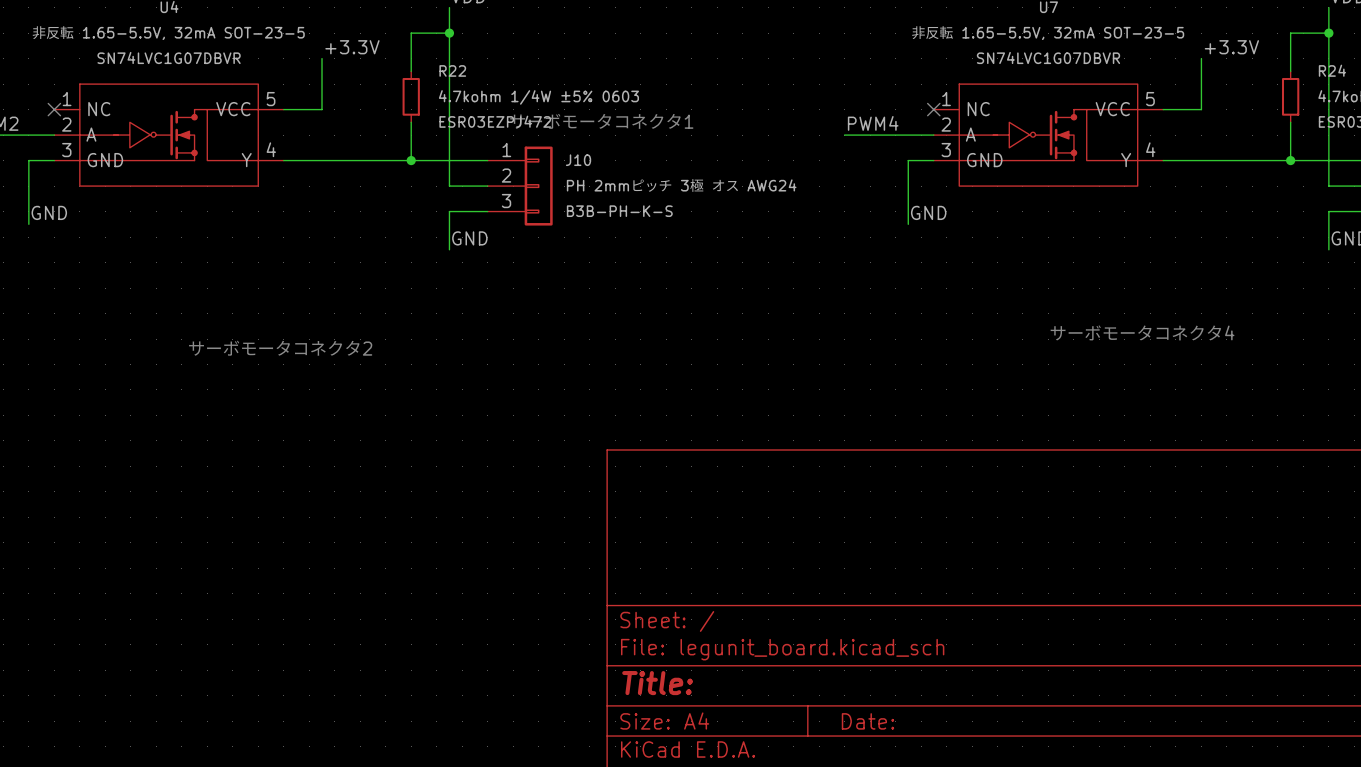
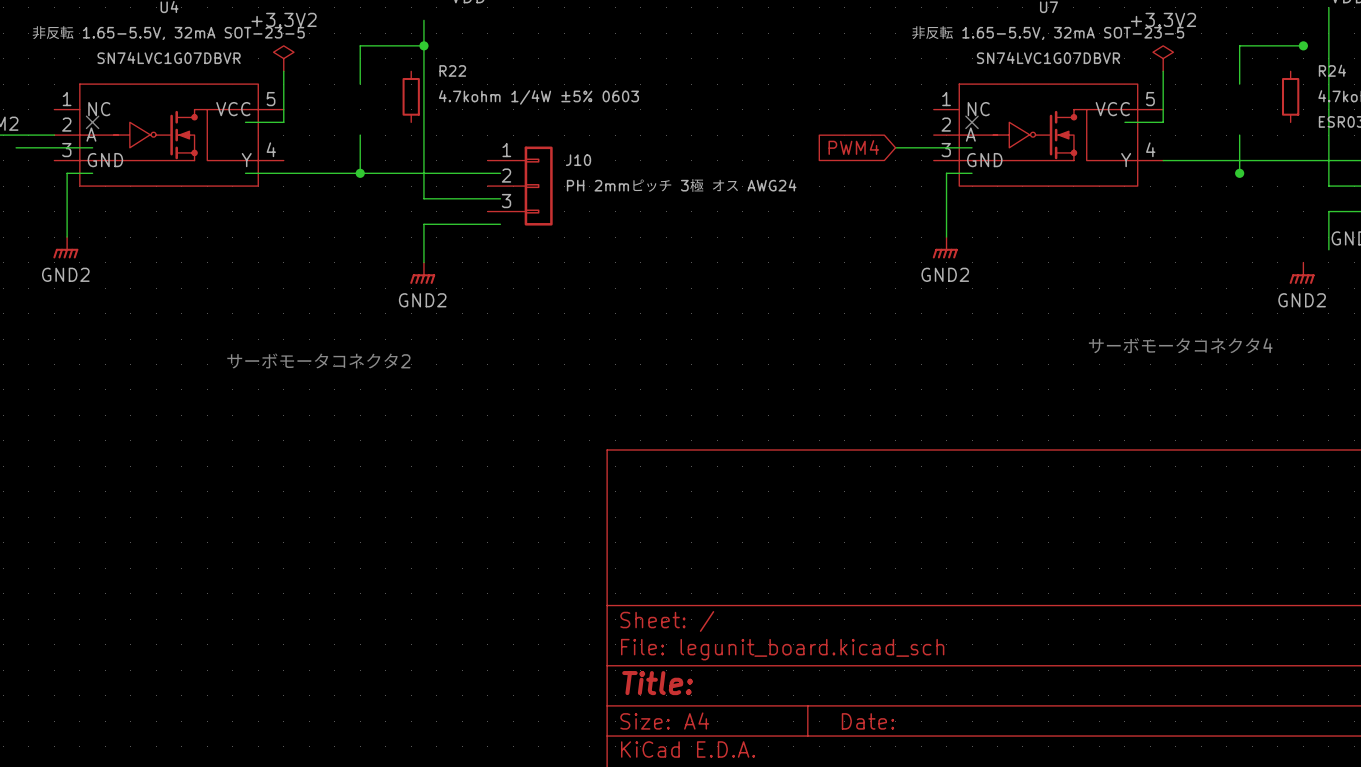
wire: (449, 7) (449, 186) (487, 186) -> none
wire: none -> (423, 20) (423, 198) (500, 198)
wire: (449, 33) (411, 33) (411, 71) -> none
junction position: (449, 33) -> (423, 45)
wire: (1328, 33) (1290, 33) (1290, 71) -> none
junction position: (1328, 33) -> (1303, 45)
wire: none -> (423, 45) (360, 45) (360, 84)
wire: none -> (1303, 45) (1239, 45) (1239, 84)
label: +3.3V (352, 47) -> none
label: +3.3V (1231, 47) -> none
power symbol: none -> +3.3V2 (283, 58)
wire: (322, 58) (322, 109) (283, 109) -> (283, 71) (283, 122) (245, 122)
power symbol: none -> +3.3V2 (1163, 58)
wire: (1201, 58) (1201, 109) (1163, 109) -> (1163, 71) (1163, 122) (1124, 122)
no-connect mark position: (54, 109) -> (92, 122)
no-connect mark position: (933, 109) -> (972, 122)
R22 text: ESR03EZPJ472 (495, 121) -> none
text: サーボモータコネクタ1 (601, 121) -> none
wire: (411, 122) (411, 160) -> (360, 135) (360, 173)
wire: (1290, 122) (1290, 160) -> (1239, 135) (1239, 173)
label: PWM4 (873, 123) -> none
wire: (844, 135) (933, 135) -> none
wire: none -> (16, 147) (92, 147)
global label: none -> PWM4 (853, 147)
wire: none -> (895, 147) (972, 147)
wire: (54, 160) (28, 160) (28, 224) -> (92, 173) (67, 173) (67, 237)
wire: (283, 160) (487, 160) -> none
junction position: (411, 160) -> (360, 173)
wire: (933, 160) (908, 160) (908, 224) -> (972, 173) (946, 173) (946, 237)
junction position: (1290, 160) -> (1239, 173)
wire: none -> (245, 173) (500, 173)
wire: (487, 211) (449, 211) (449, 249) -> none
J10 text: B3B-PH-K-S (619, 211) -> none
label: GND (49, 212) -> none
label: GND (928, 212) -> none
wire: none -> (500, 224) (423, 224) (423, 262)
label: GND (469, 238) -> none
power symbol: none -> GND2 (65, 247)
power symbol: none -> GND2 (945, 247)
power symbol: none -> GND2 (422, 273)
power symbol: none -> GND2 (1302, 273)
text position: サーボモータコネクタ4 (1142, 332) -> サーボモータコネクタ4 (1180, 345)
text position: サーボモータコネクタ2 (280, 348) -> サーボモータコネクタ2 (318, 360)

